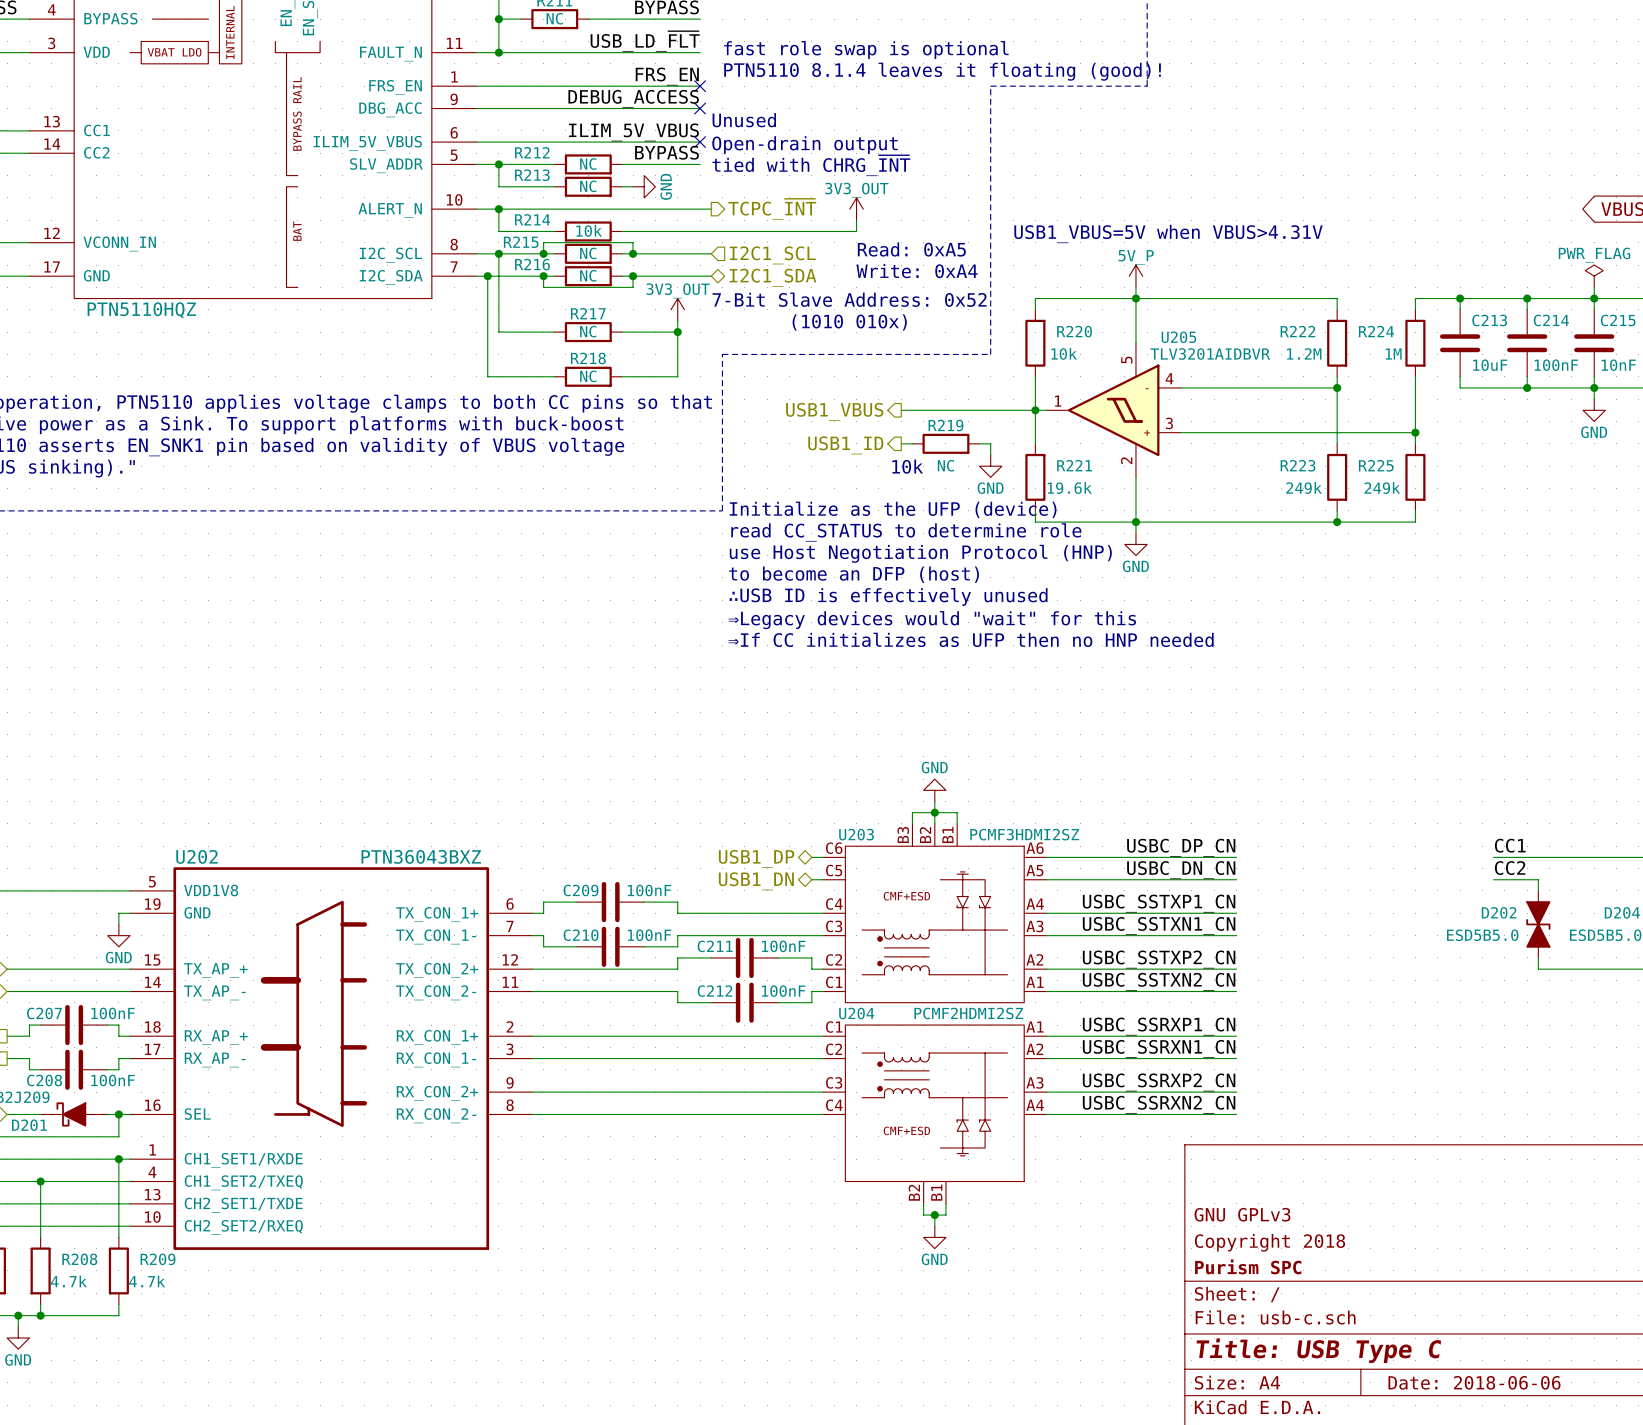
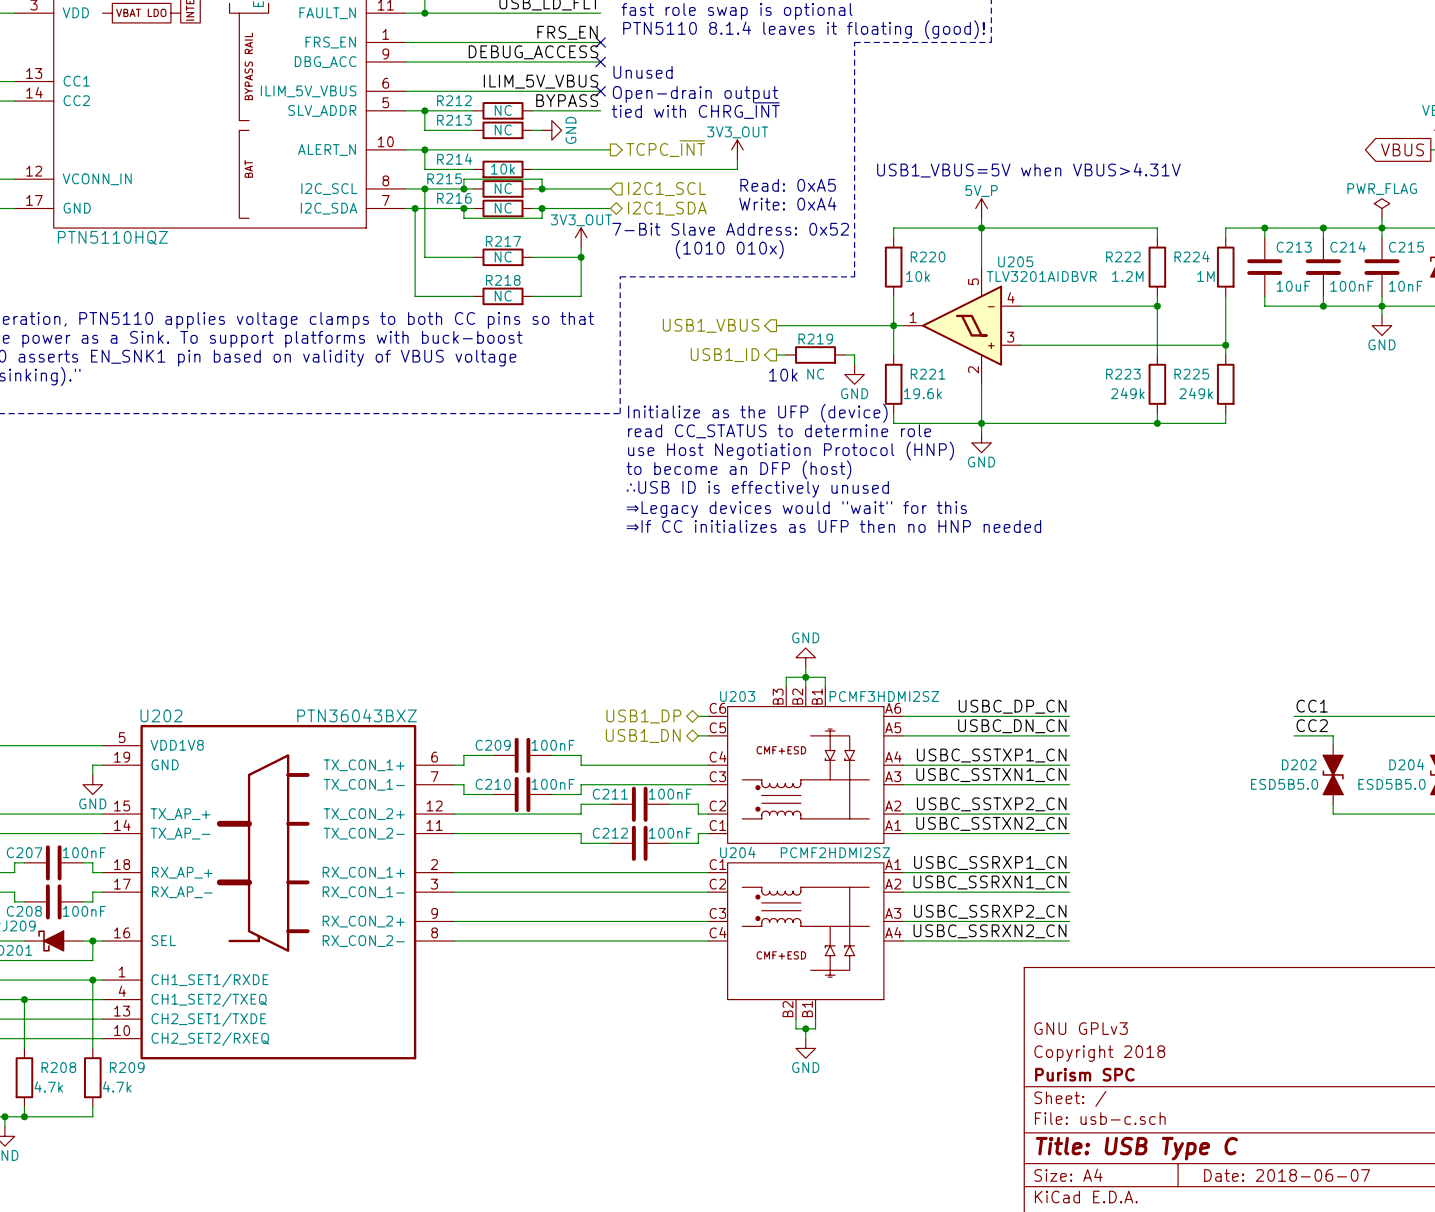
title block: Date: 2018-06-06 (1474, 1382) -> Date: 2018-06-07 (1287, 1175)

